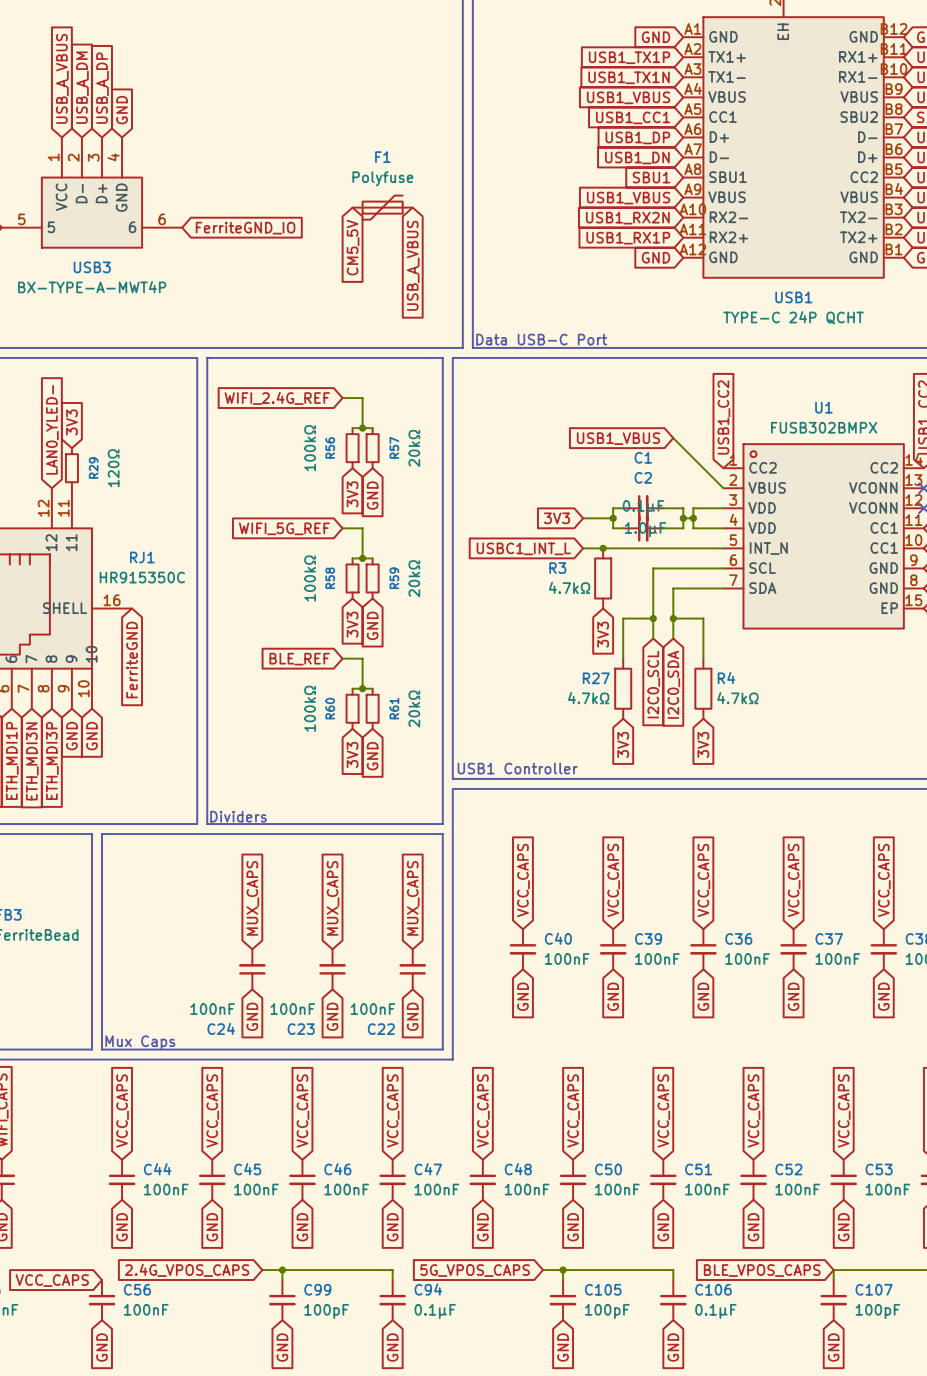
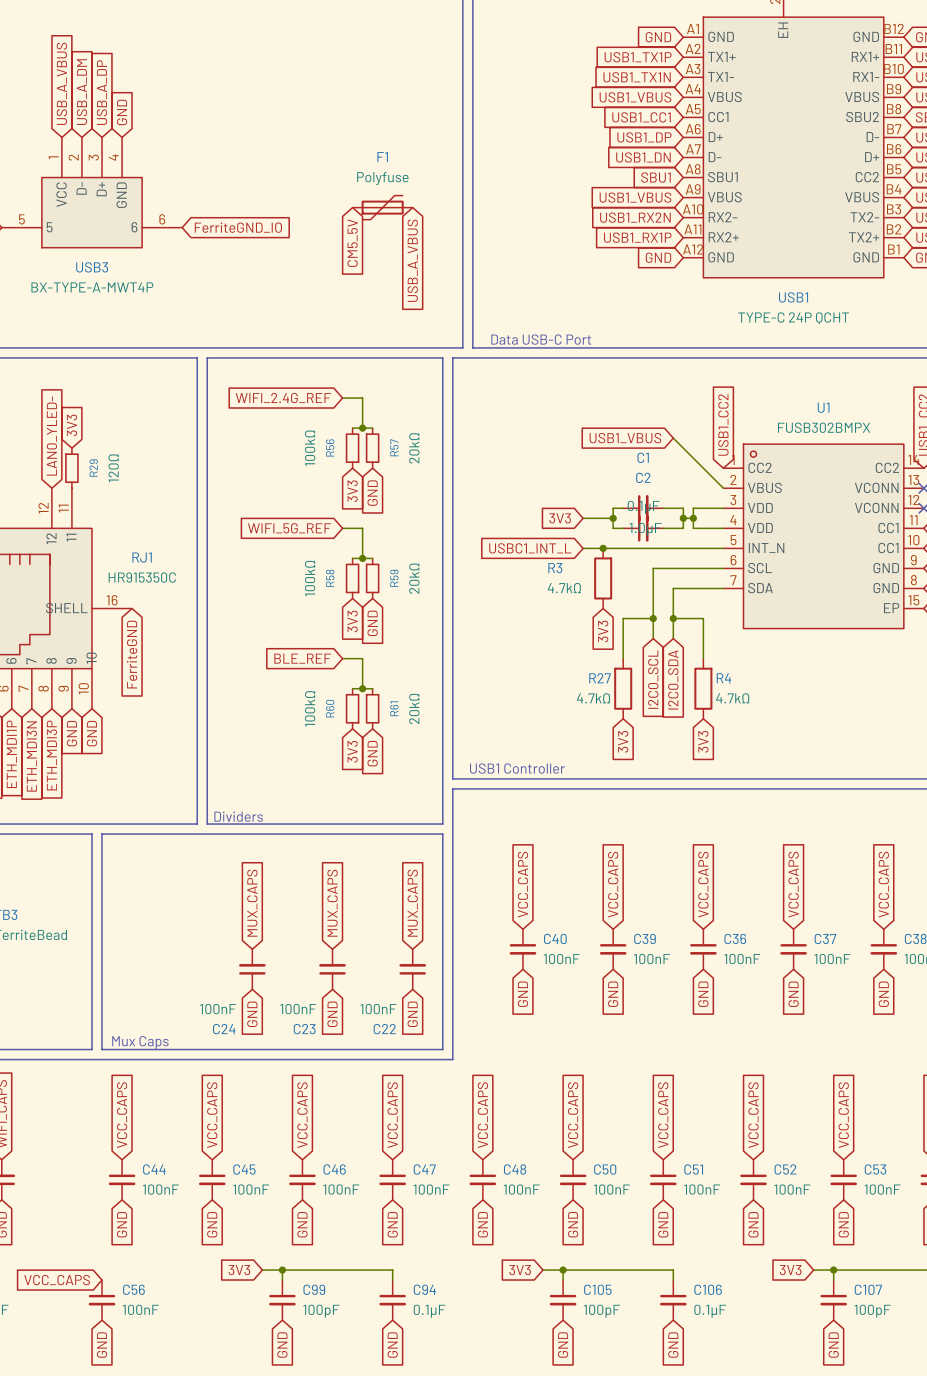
global label: 2.4G_VPOS_CAPS (187, 1270) -> 3V3 (239, 1270)
global label: 5G_VPOS_CAPS (475, 1270) -> 3V3 (520, 1270)
global label: BLE_VPOS_CAPS (762, 1270) -> none
global label: none -> 3V3 (790, 1270)
wire: none -> (813, 1270) (833, 1270)
junction: none -> (833, 1270)

